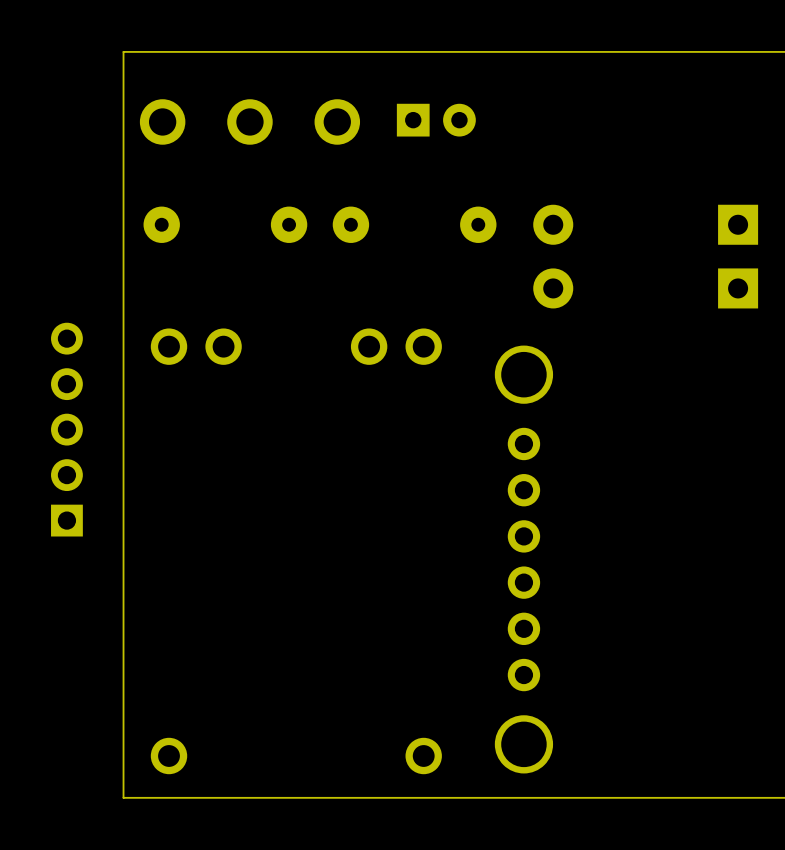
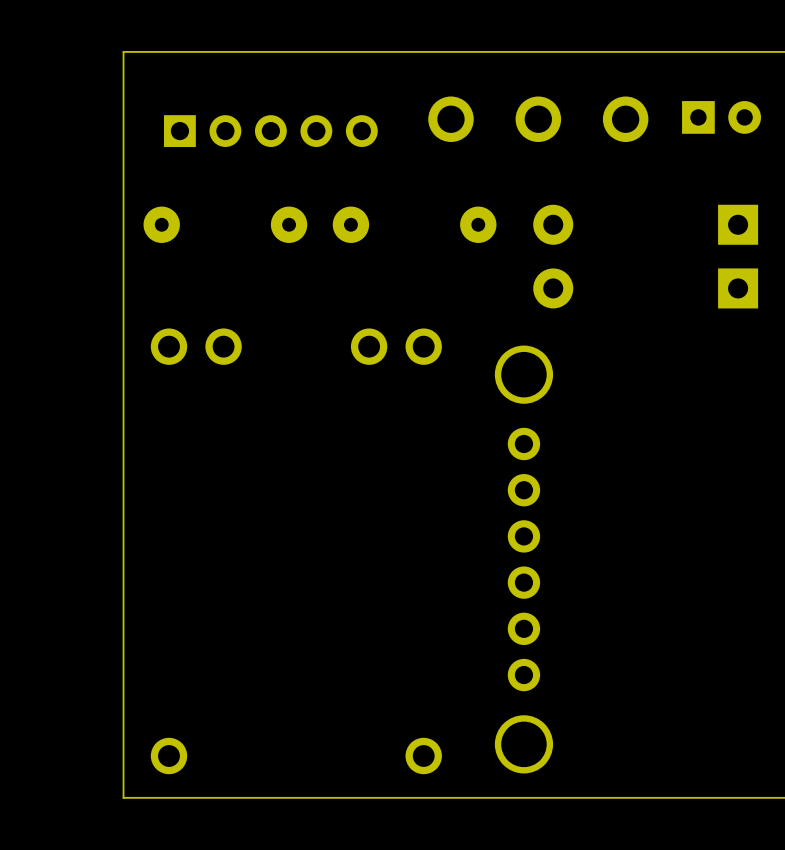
part position: (436, 120) -> (721, 117)
part position: (249, 121) -> (538, 119)
part rotation: 0° (66, 429) -> 90° clockwise (270, 131)
part position: (66, 429) -> (270, 131)

